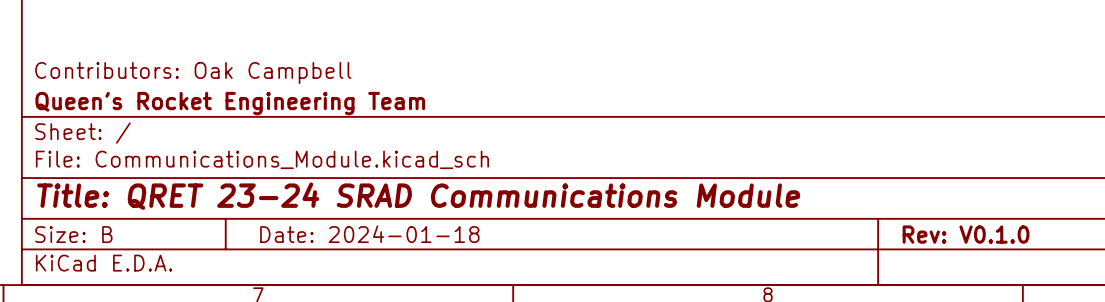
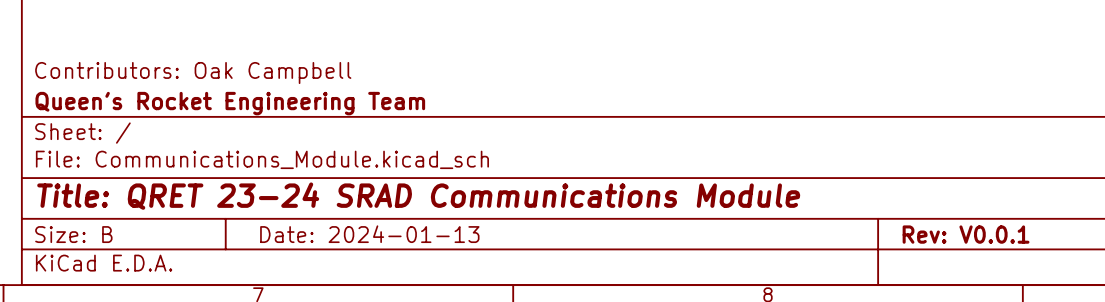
title block: Date: 2024-01-18 (369, 234) -> Date: 2024-01-13 (369, 234)
title block: Rev: V0.1.0 (966, 234) -> Rev: V0.0.1 (966, 234)

